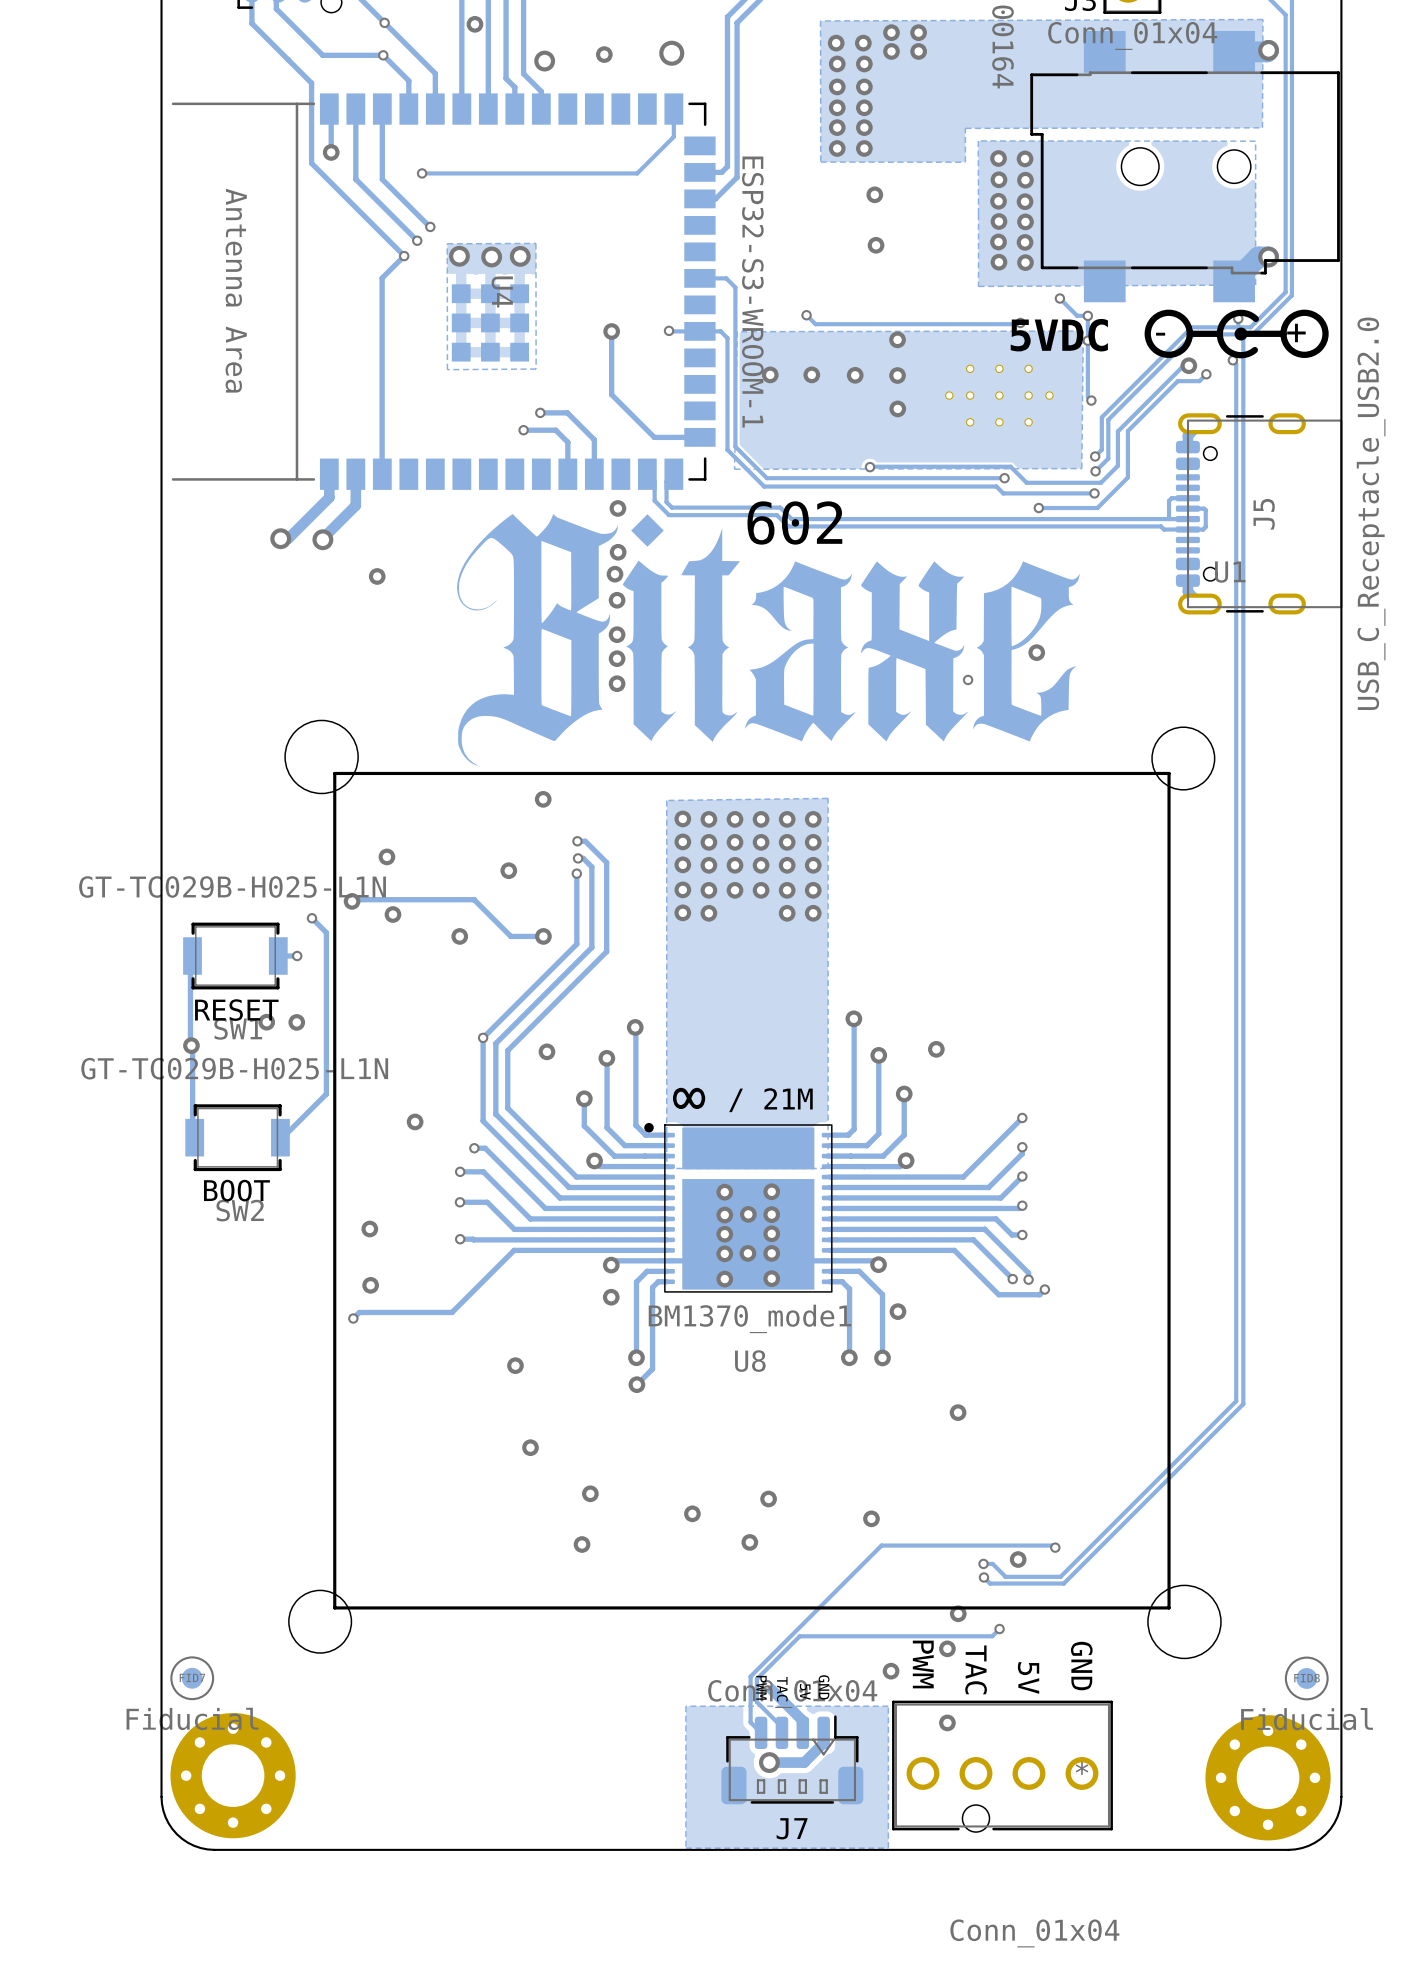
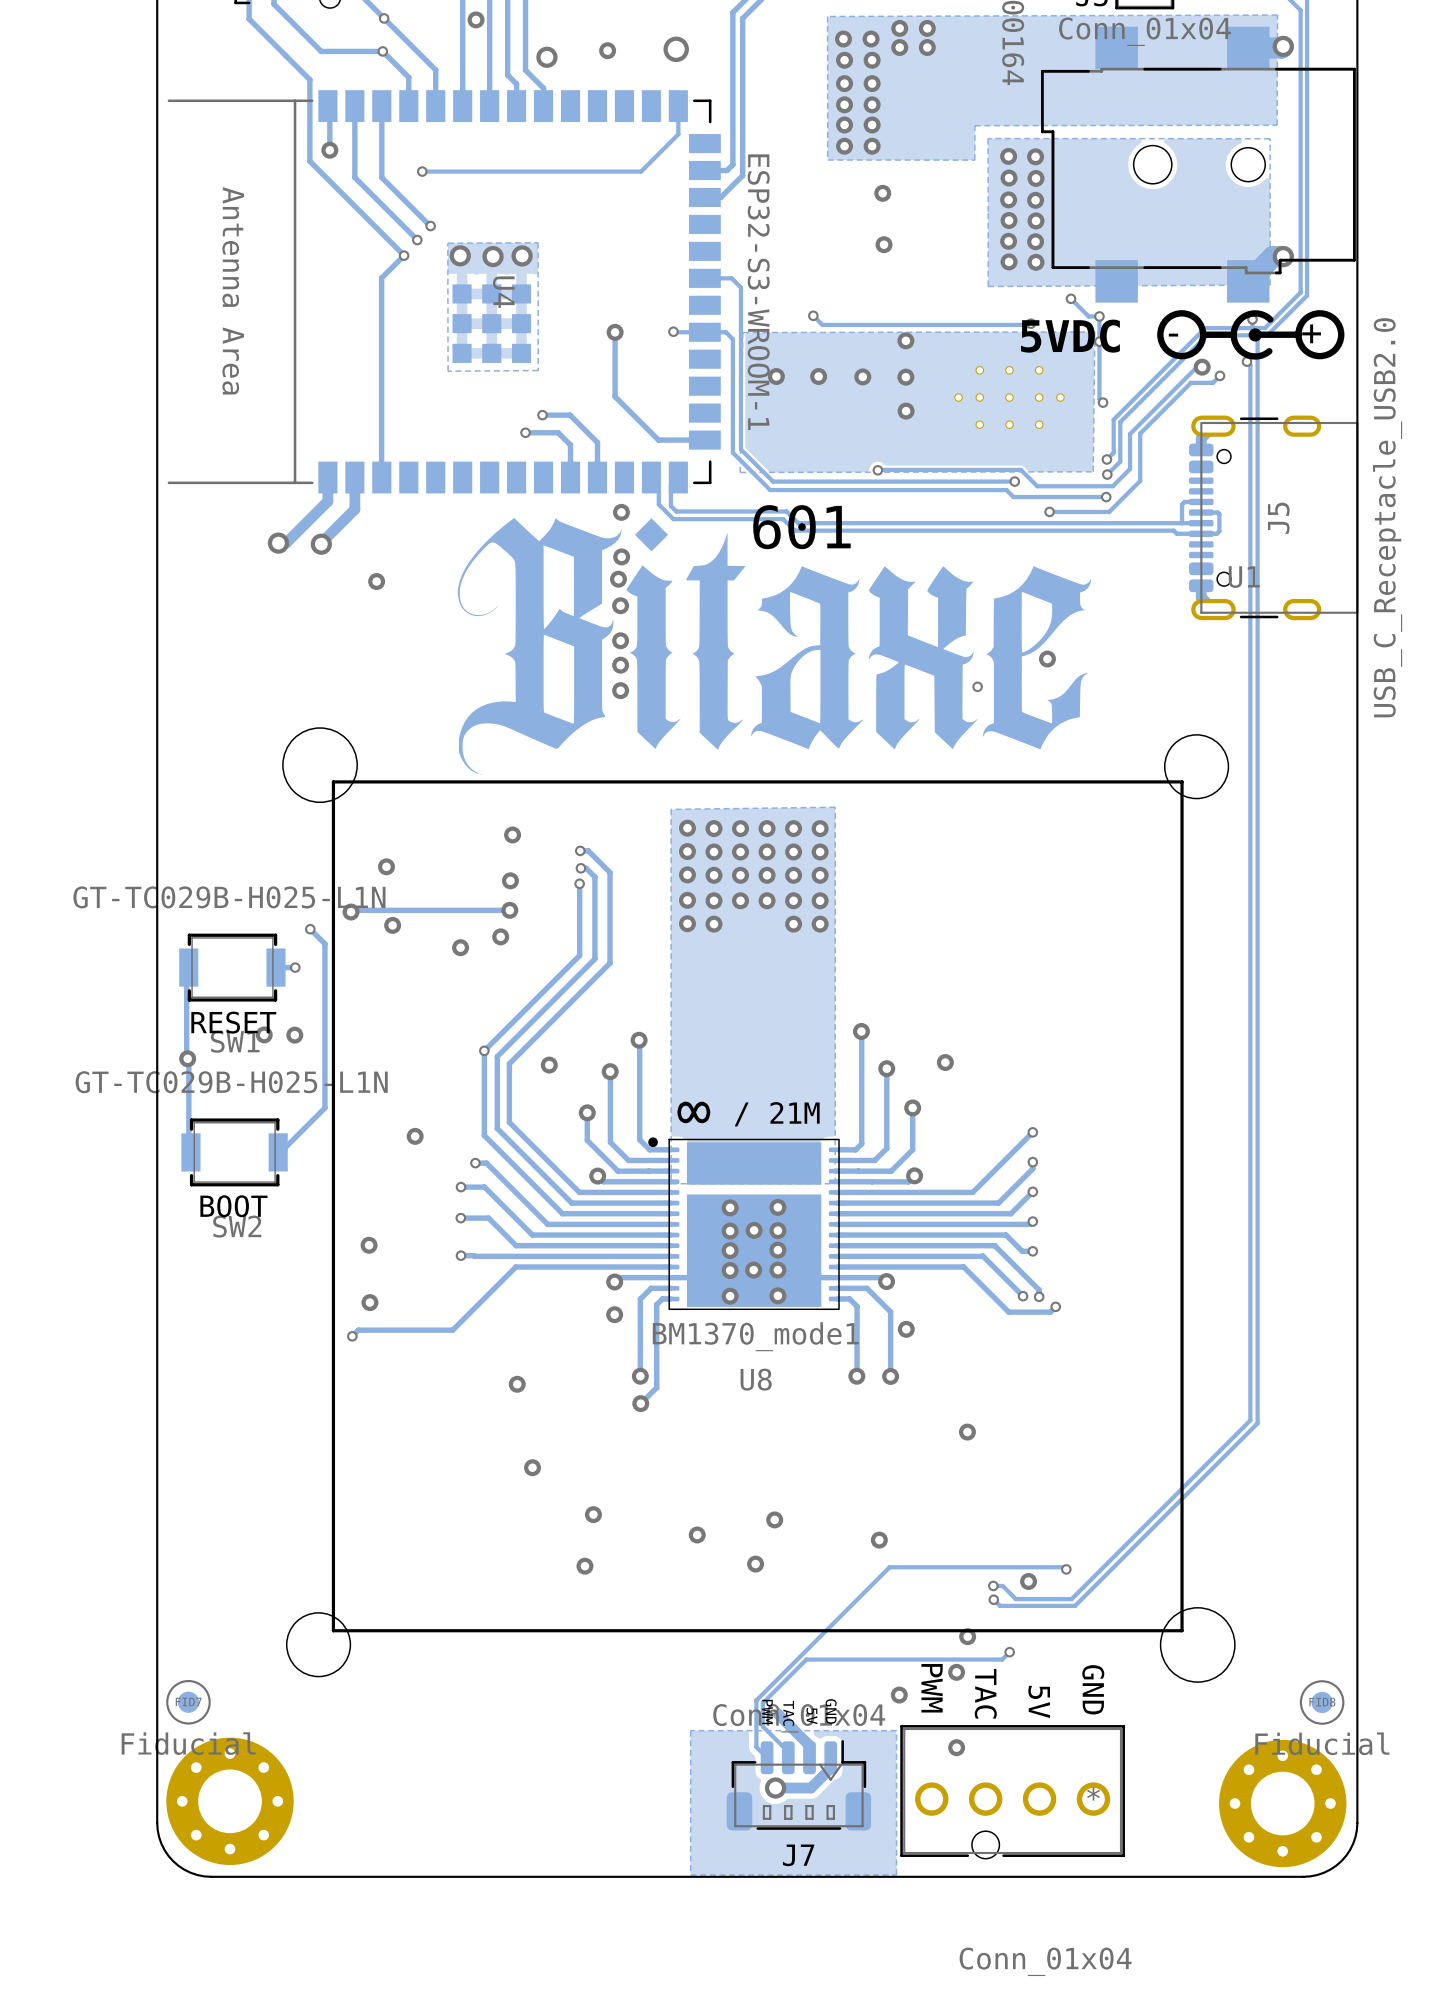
text: 602 (794, 522) -> 601 (801, 527)
via position: (543, 799) -> (512, 834)
track: (474, 899) (510, 936) (543, 936) -> (475, 910) (509, 910)
via: none -> (509, 910)
via: none -> (500, 936)
via: (543, 936) -> none

